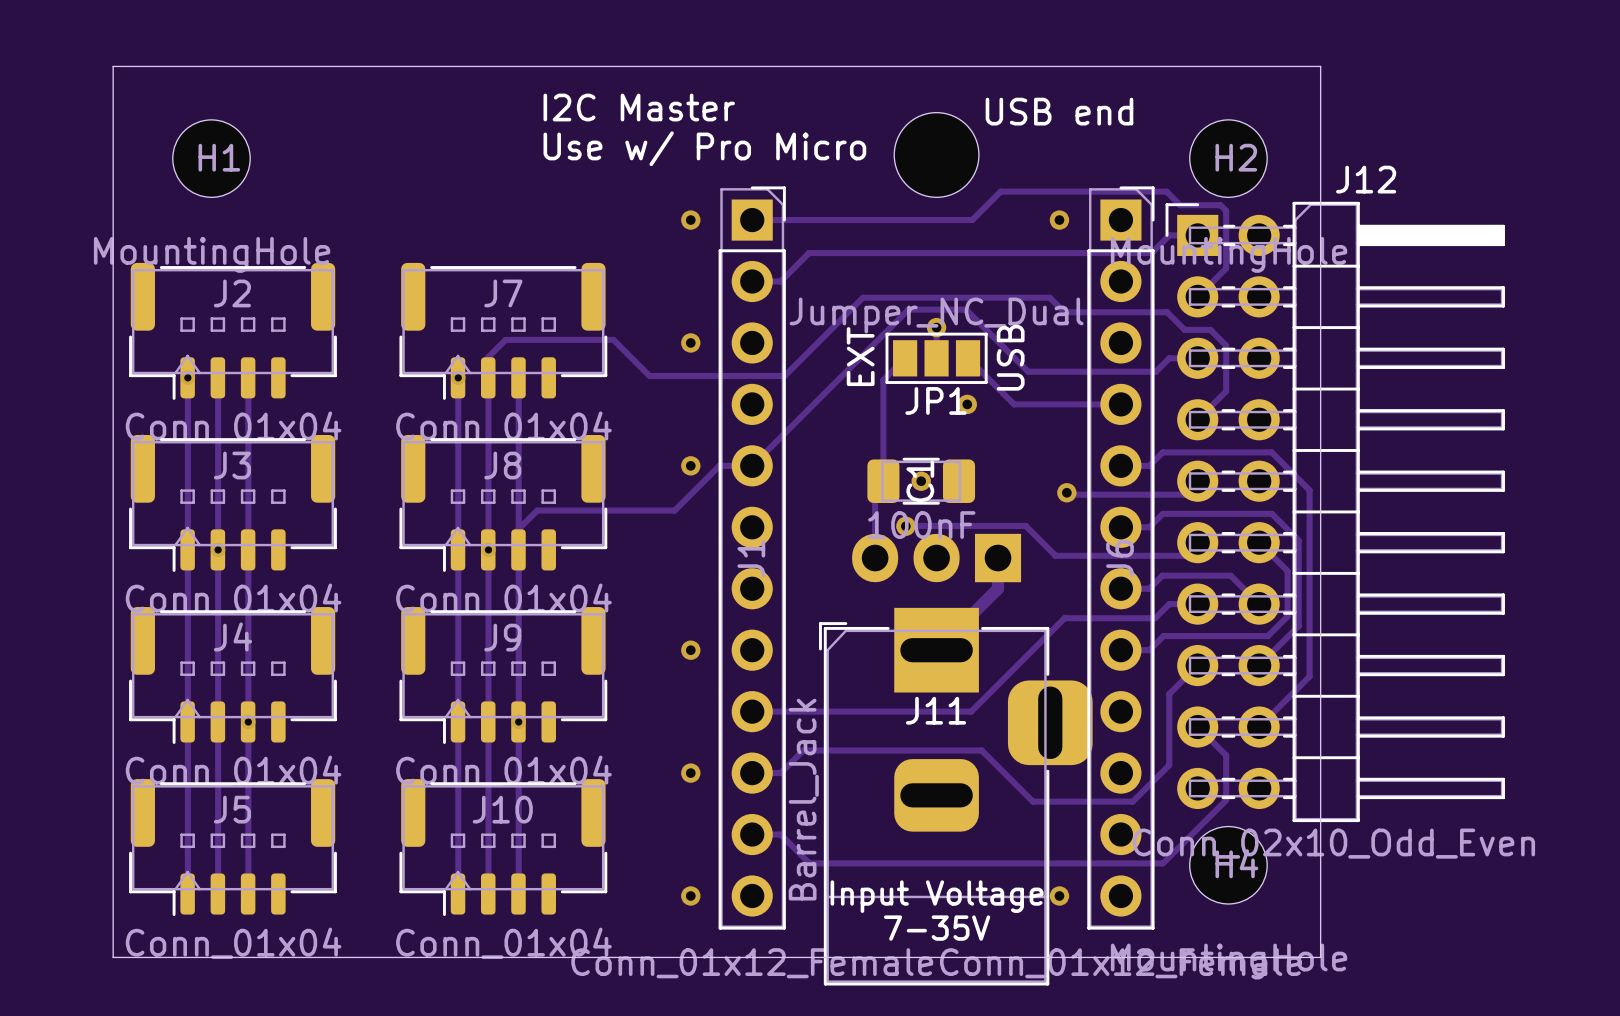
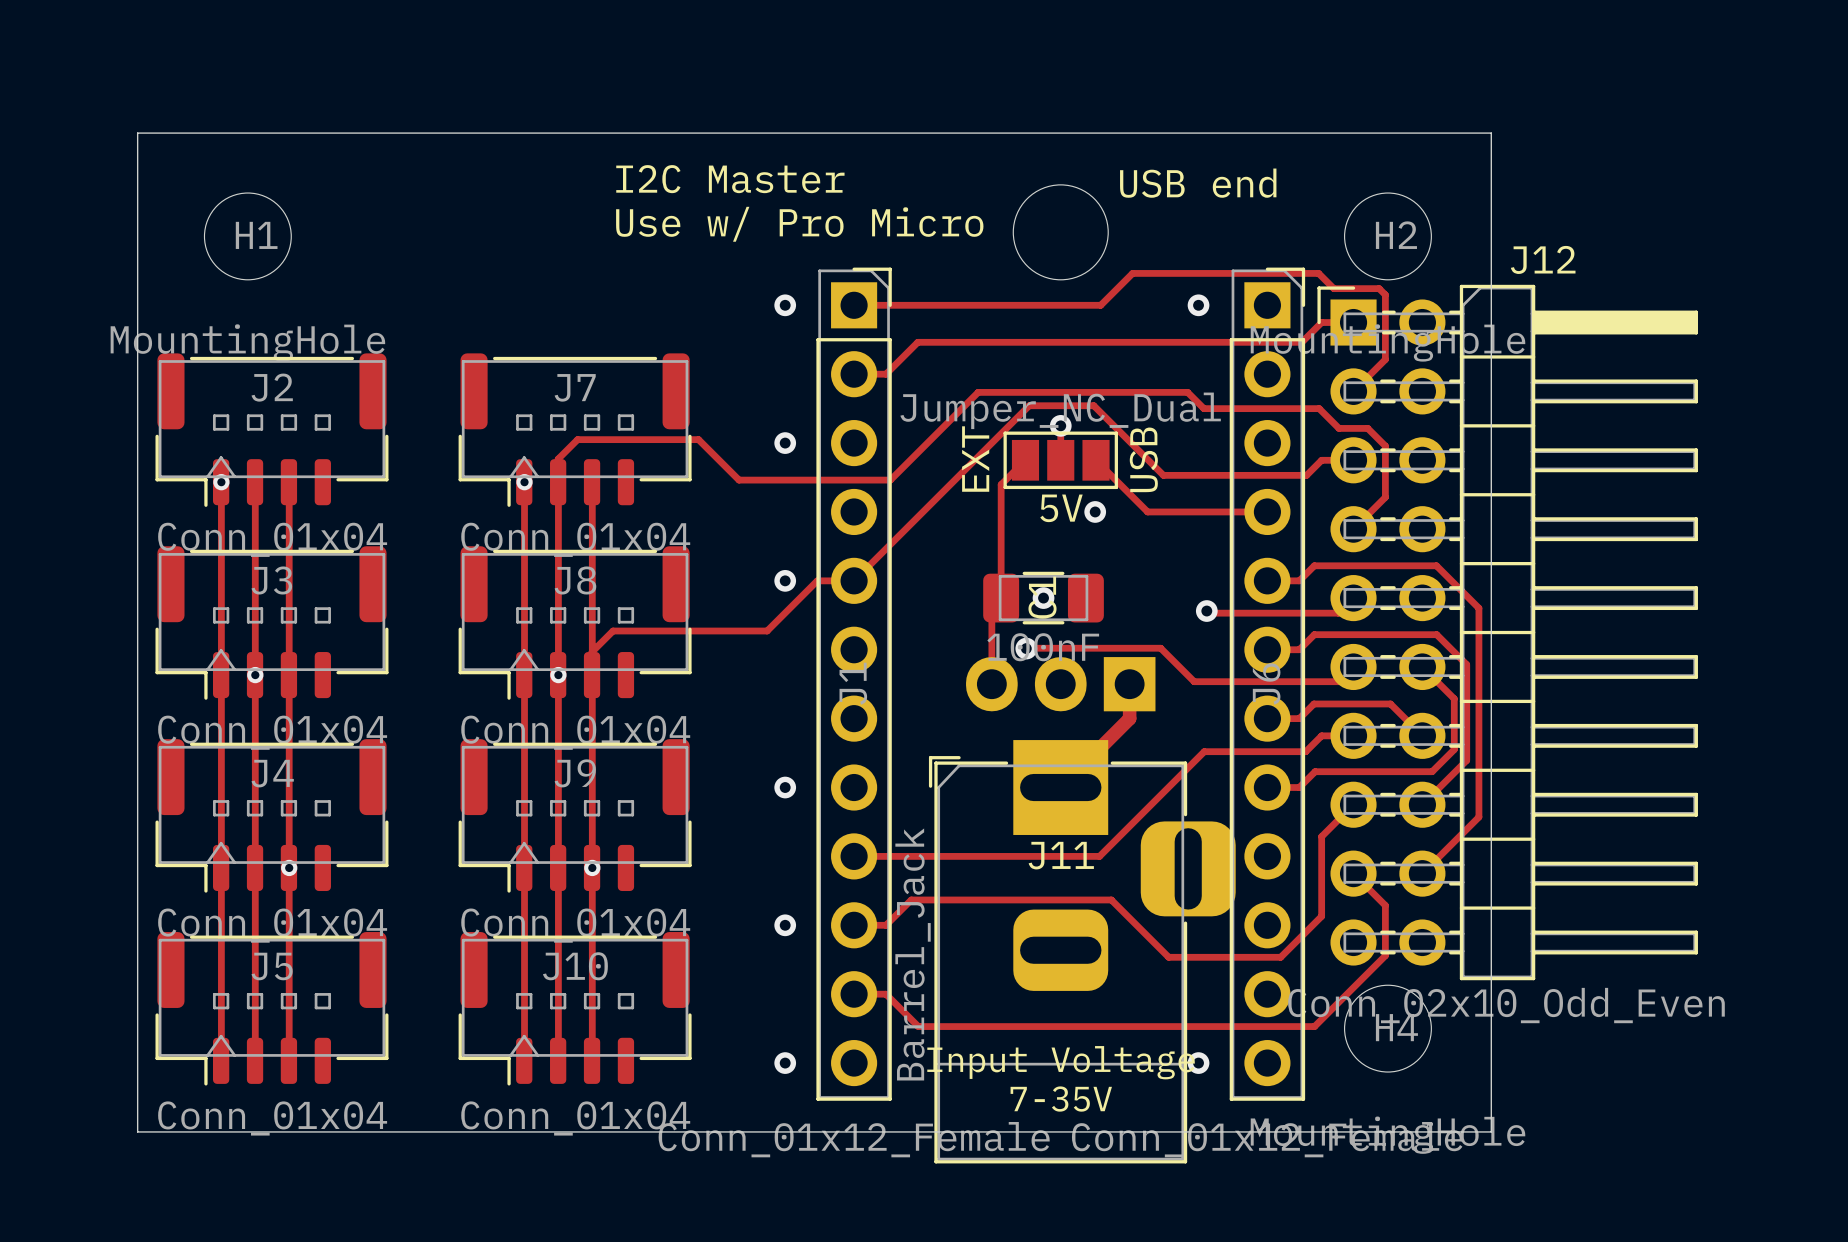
JP1 name: JP1 (936, 400) -> 5V (1061, 508)

